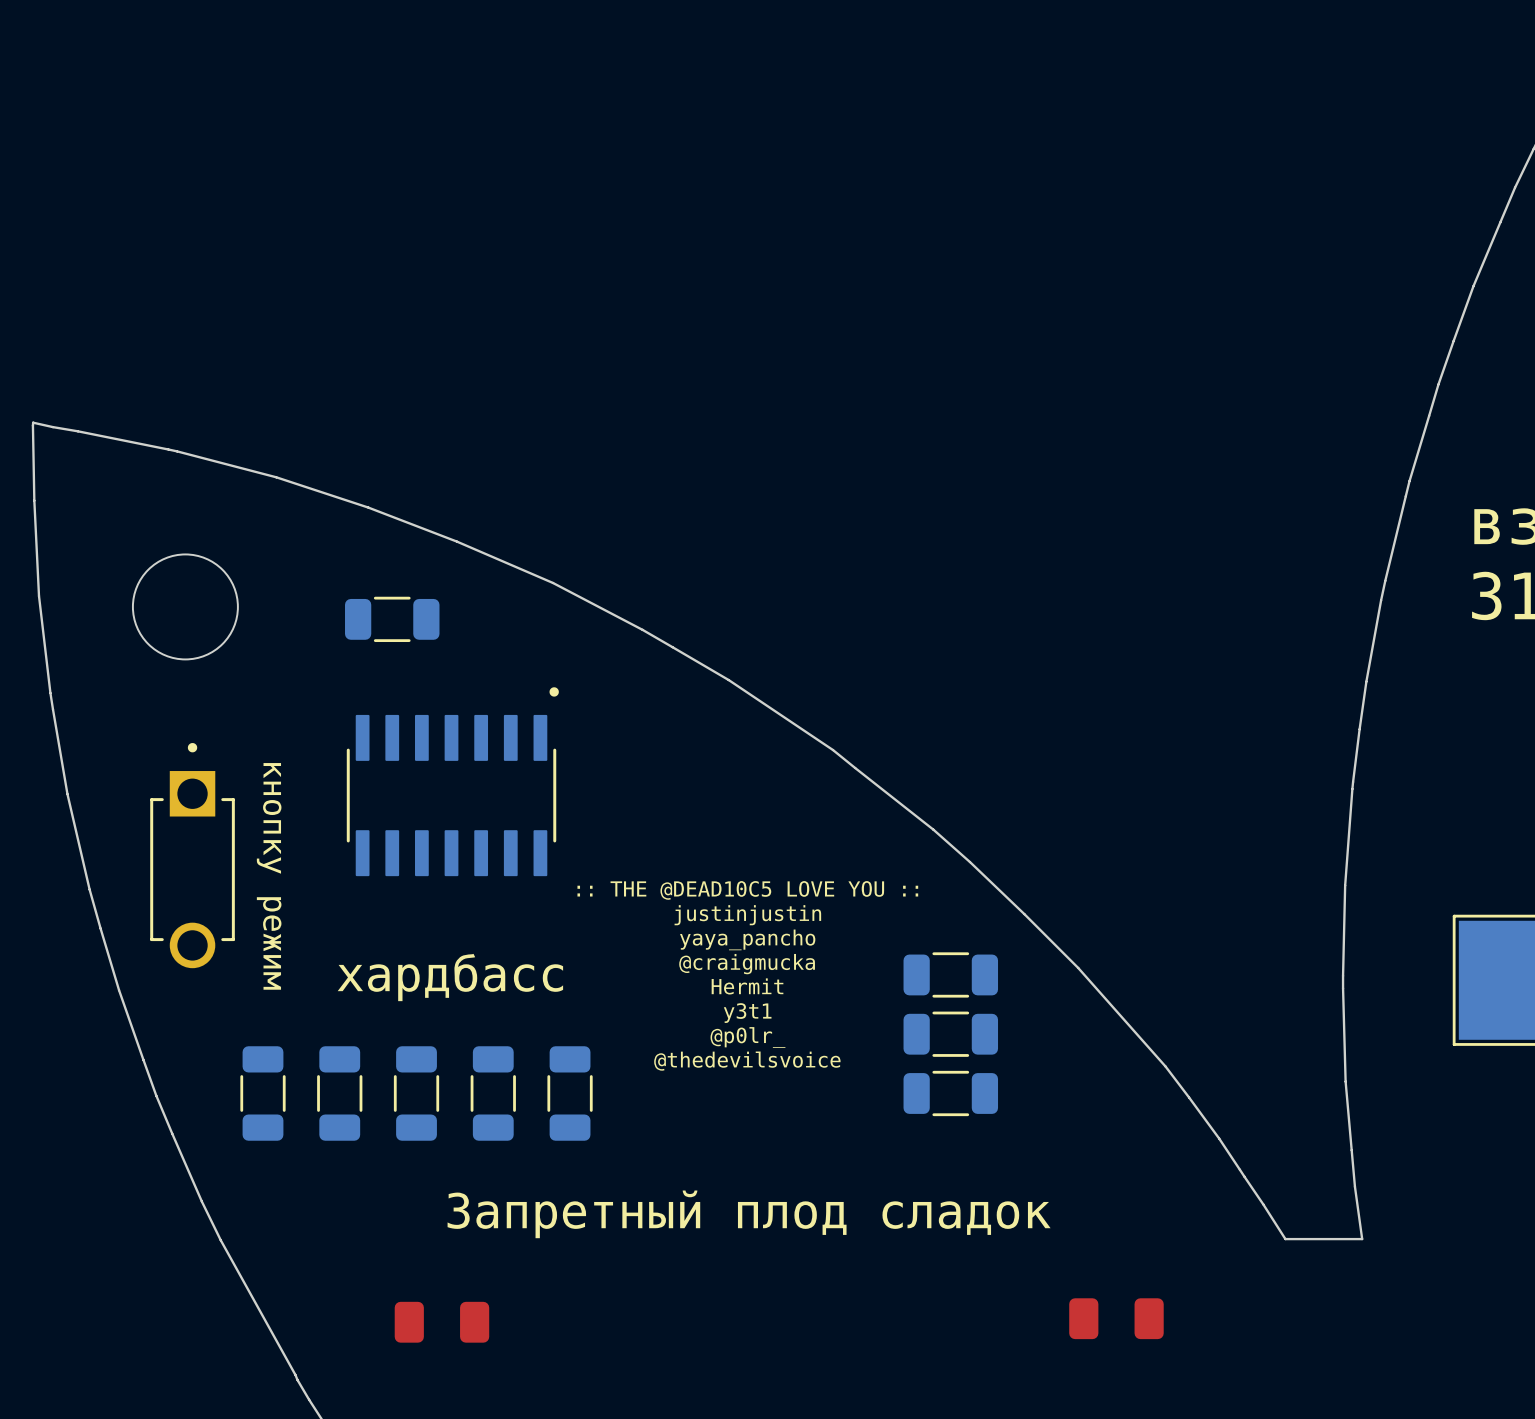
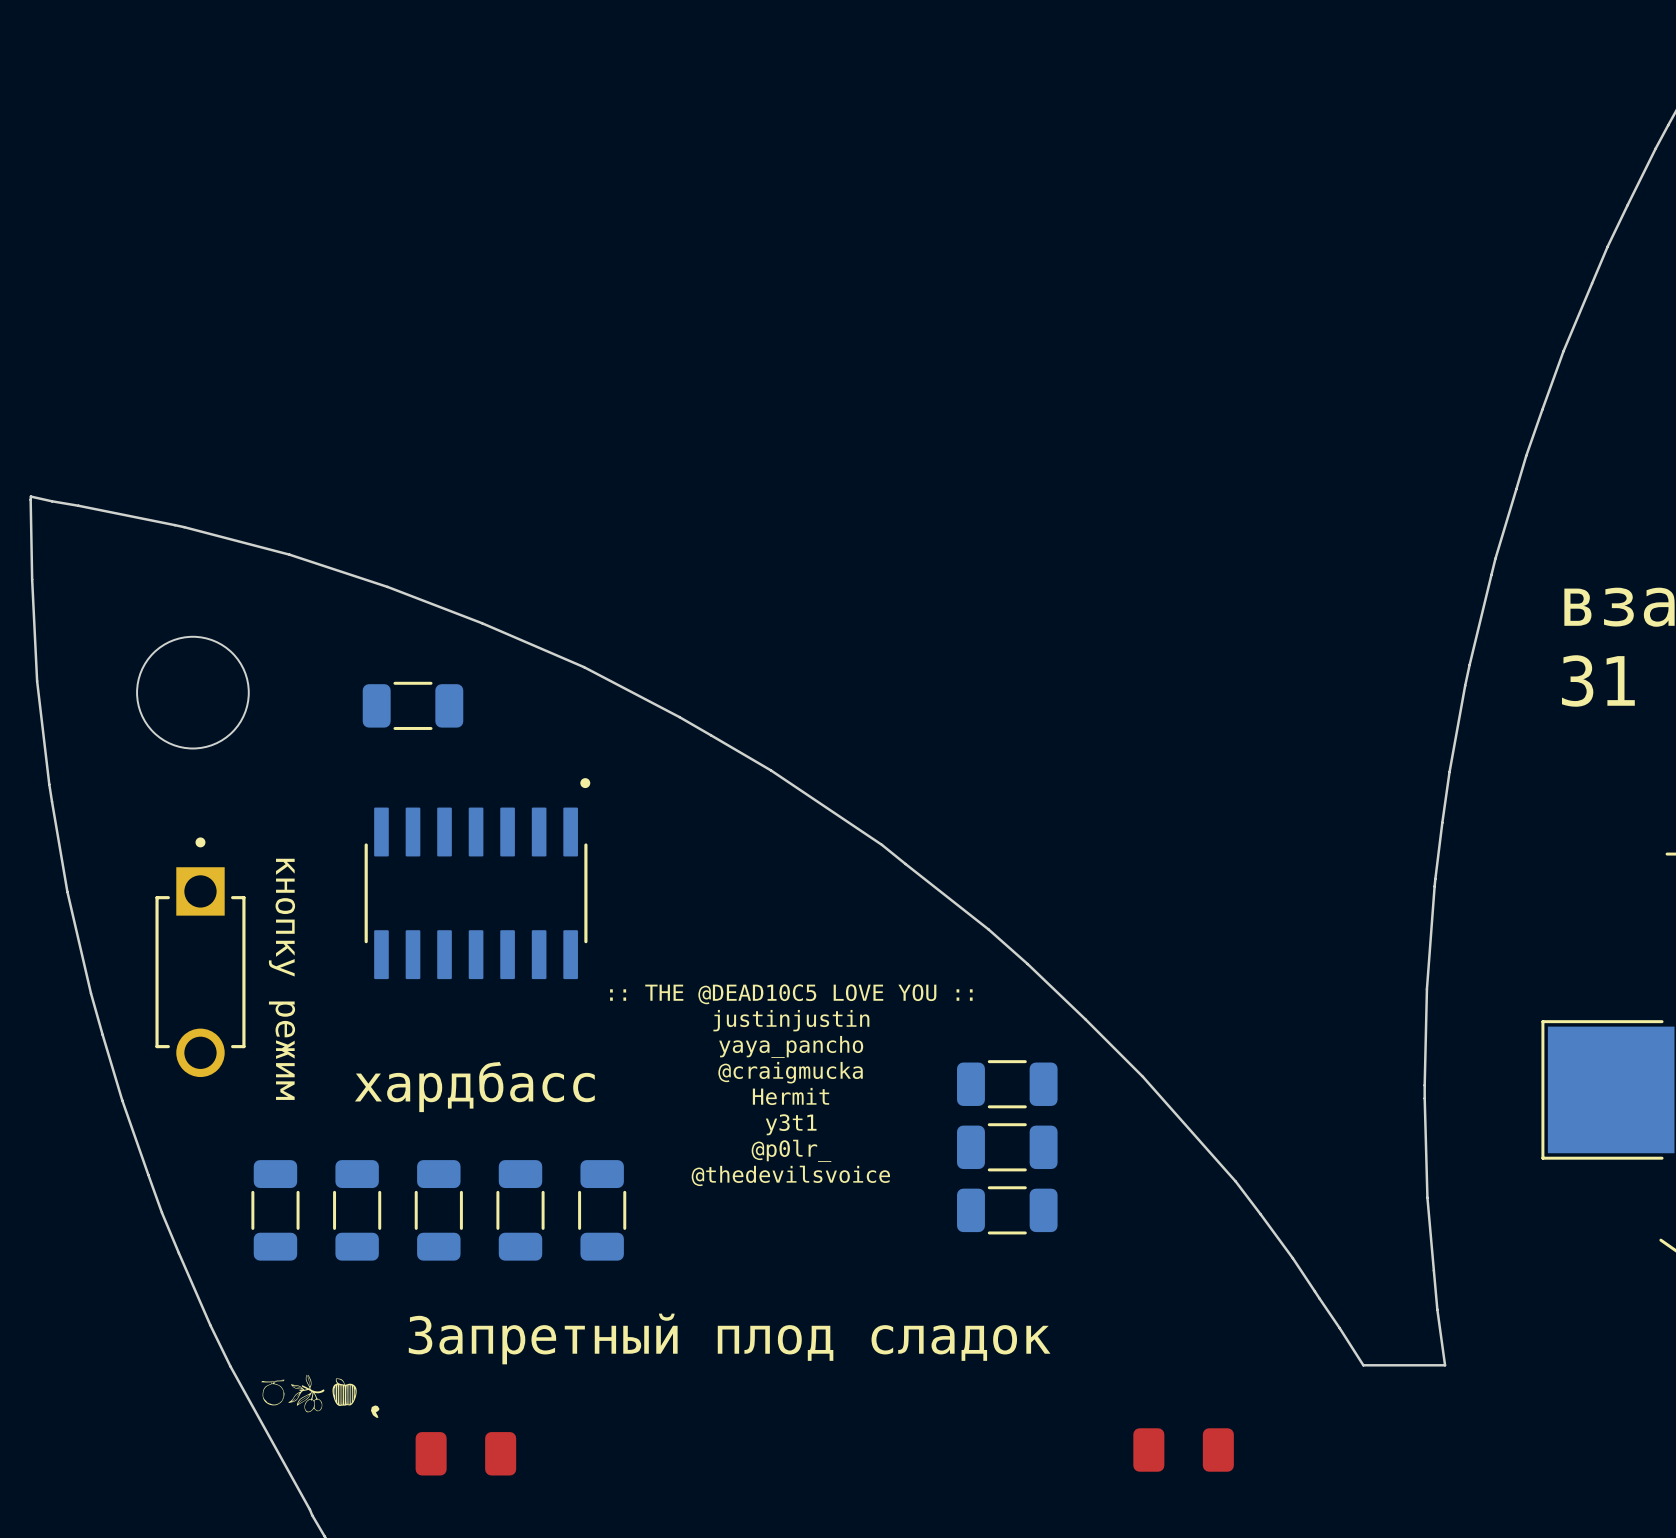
text position: Запретный плод сладок (749, 1214) -> Запретный плод сладок (729, 1338)
drawing: none -> [261, 1374, 380, 1418]

